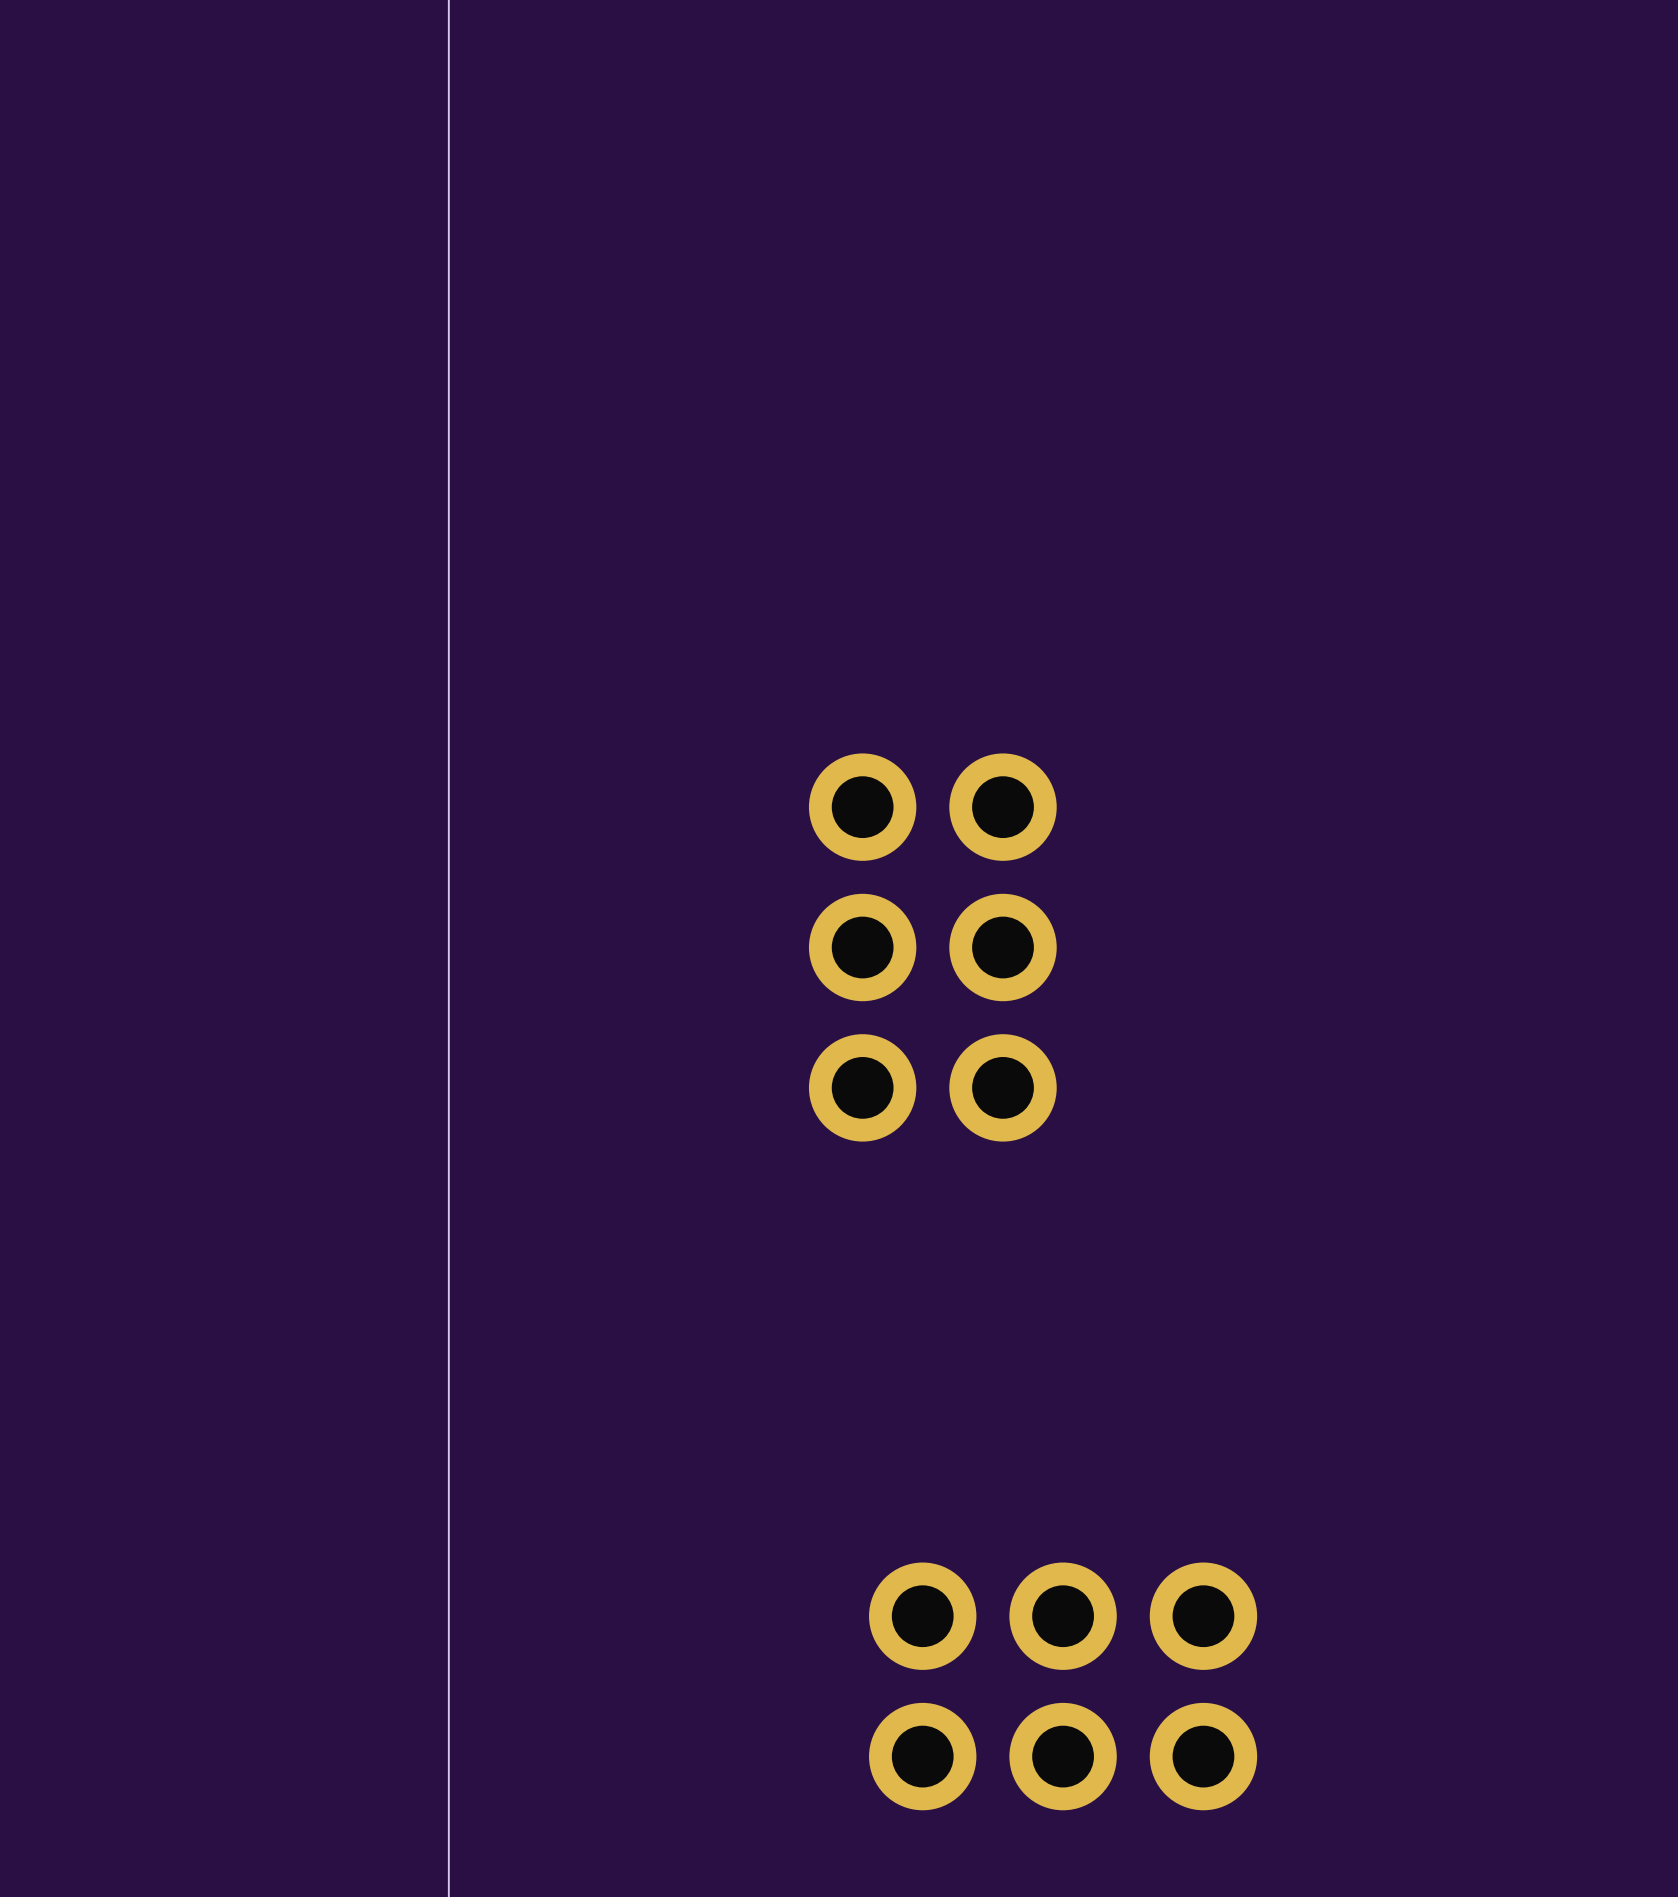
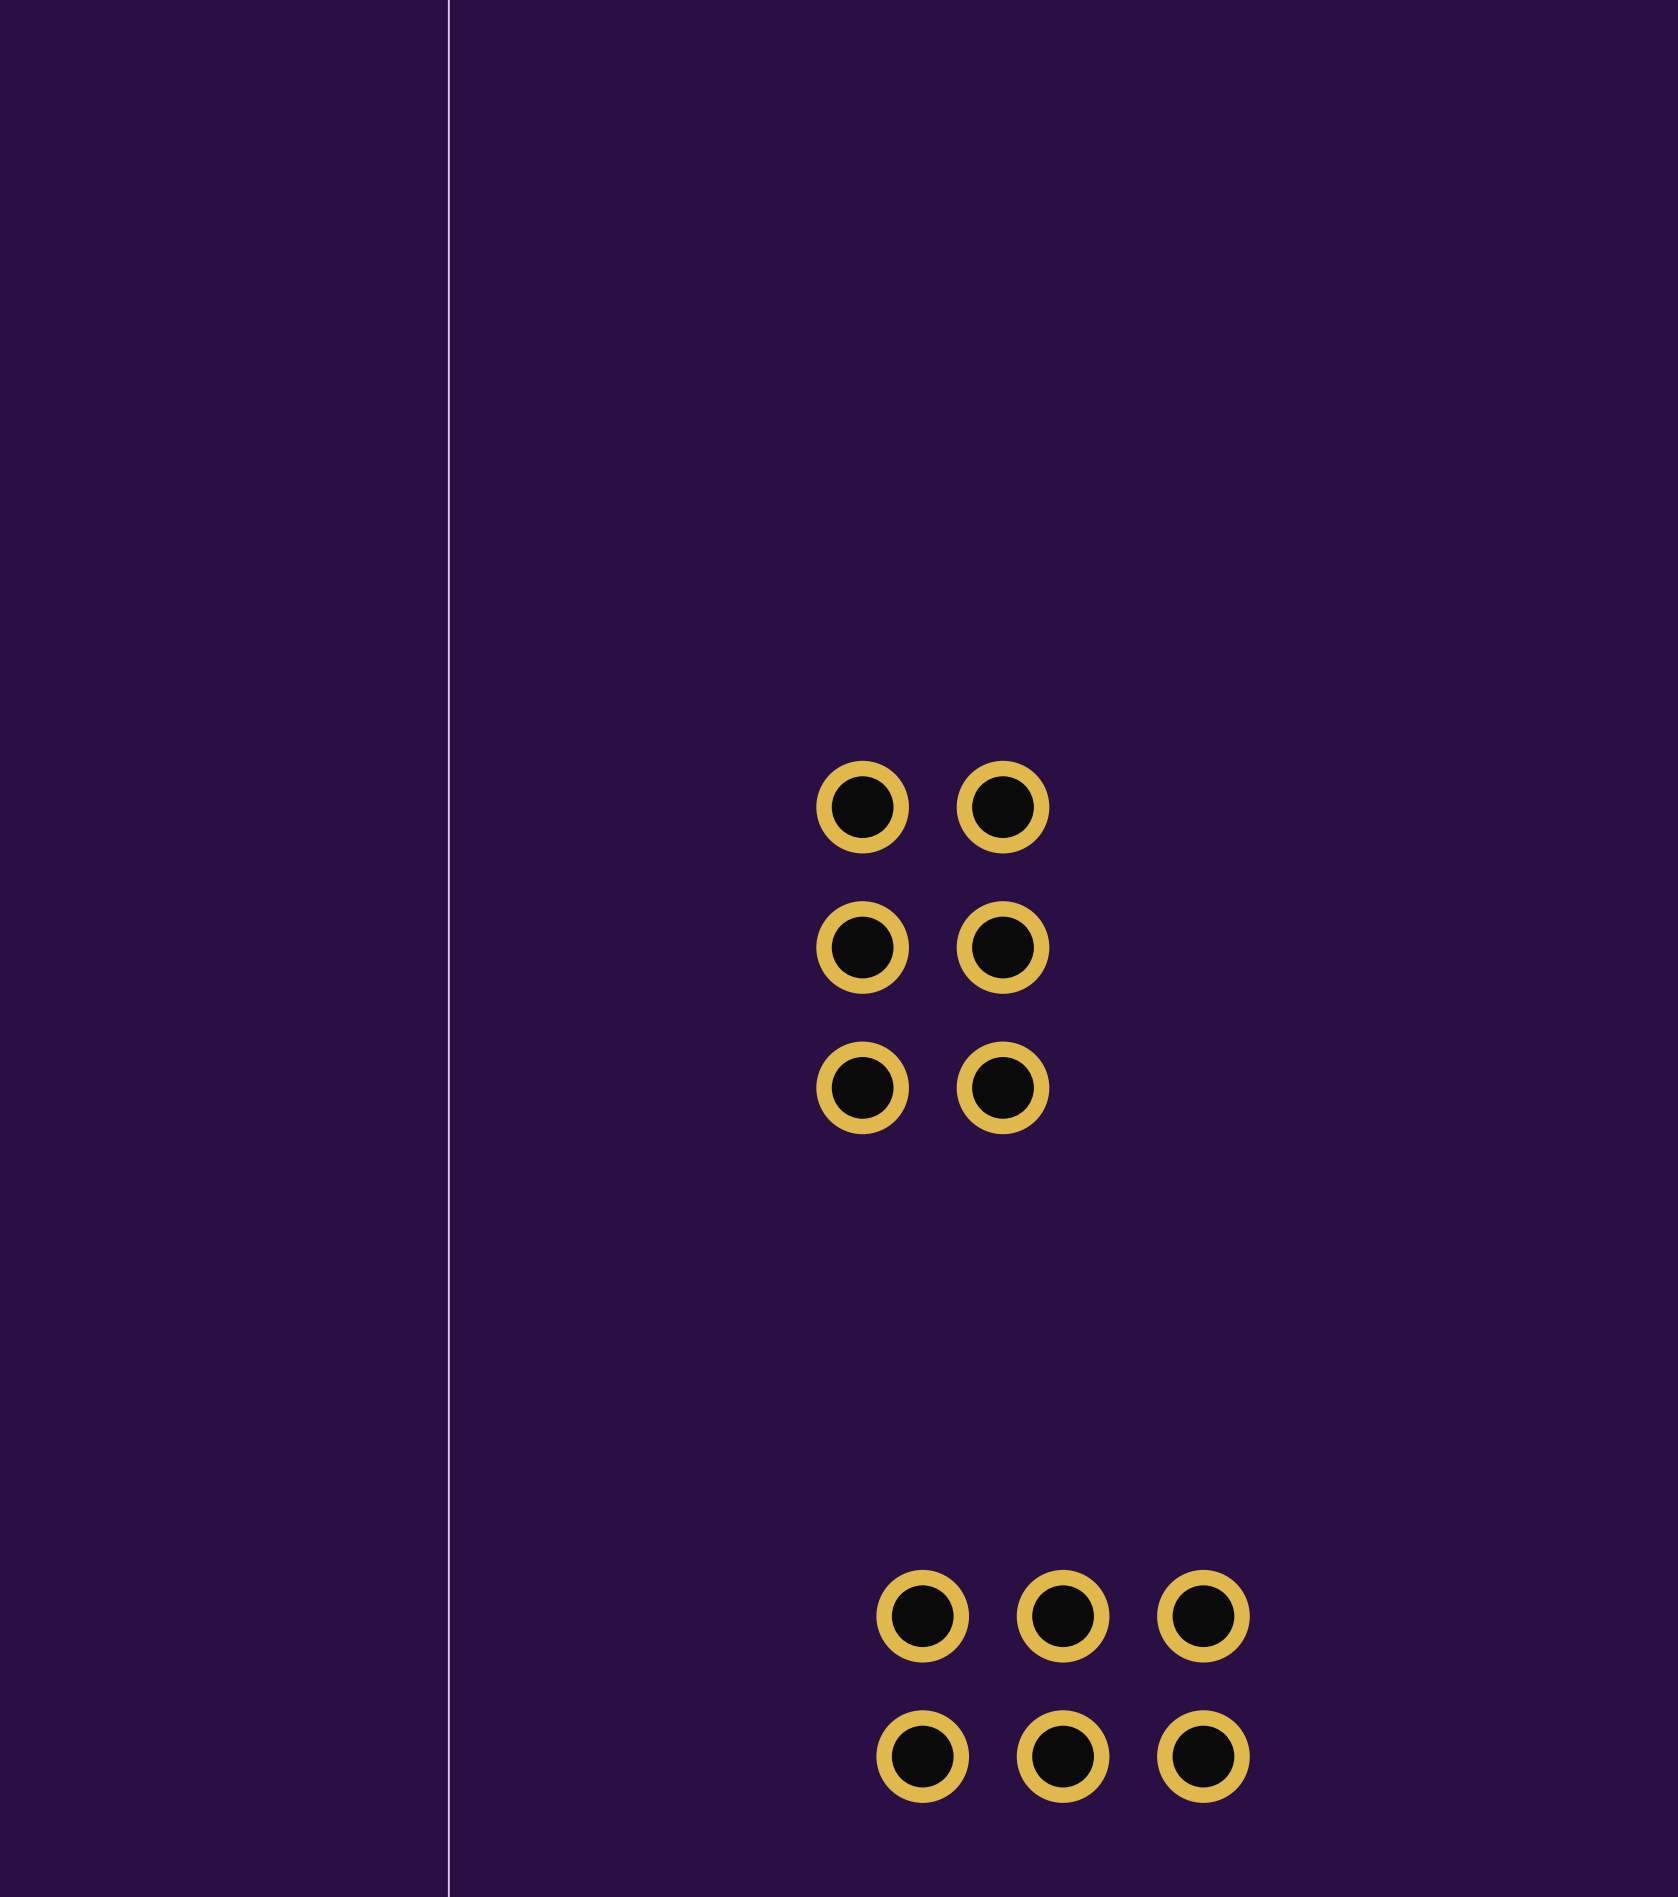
part footprint: [808, 753, 1057, 1142] -> [816, 760, 1050, 1135]
part footprint: [869, 1562, 1258, 1811] -> [876, 1569, 1250, 1803]

